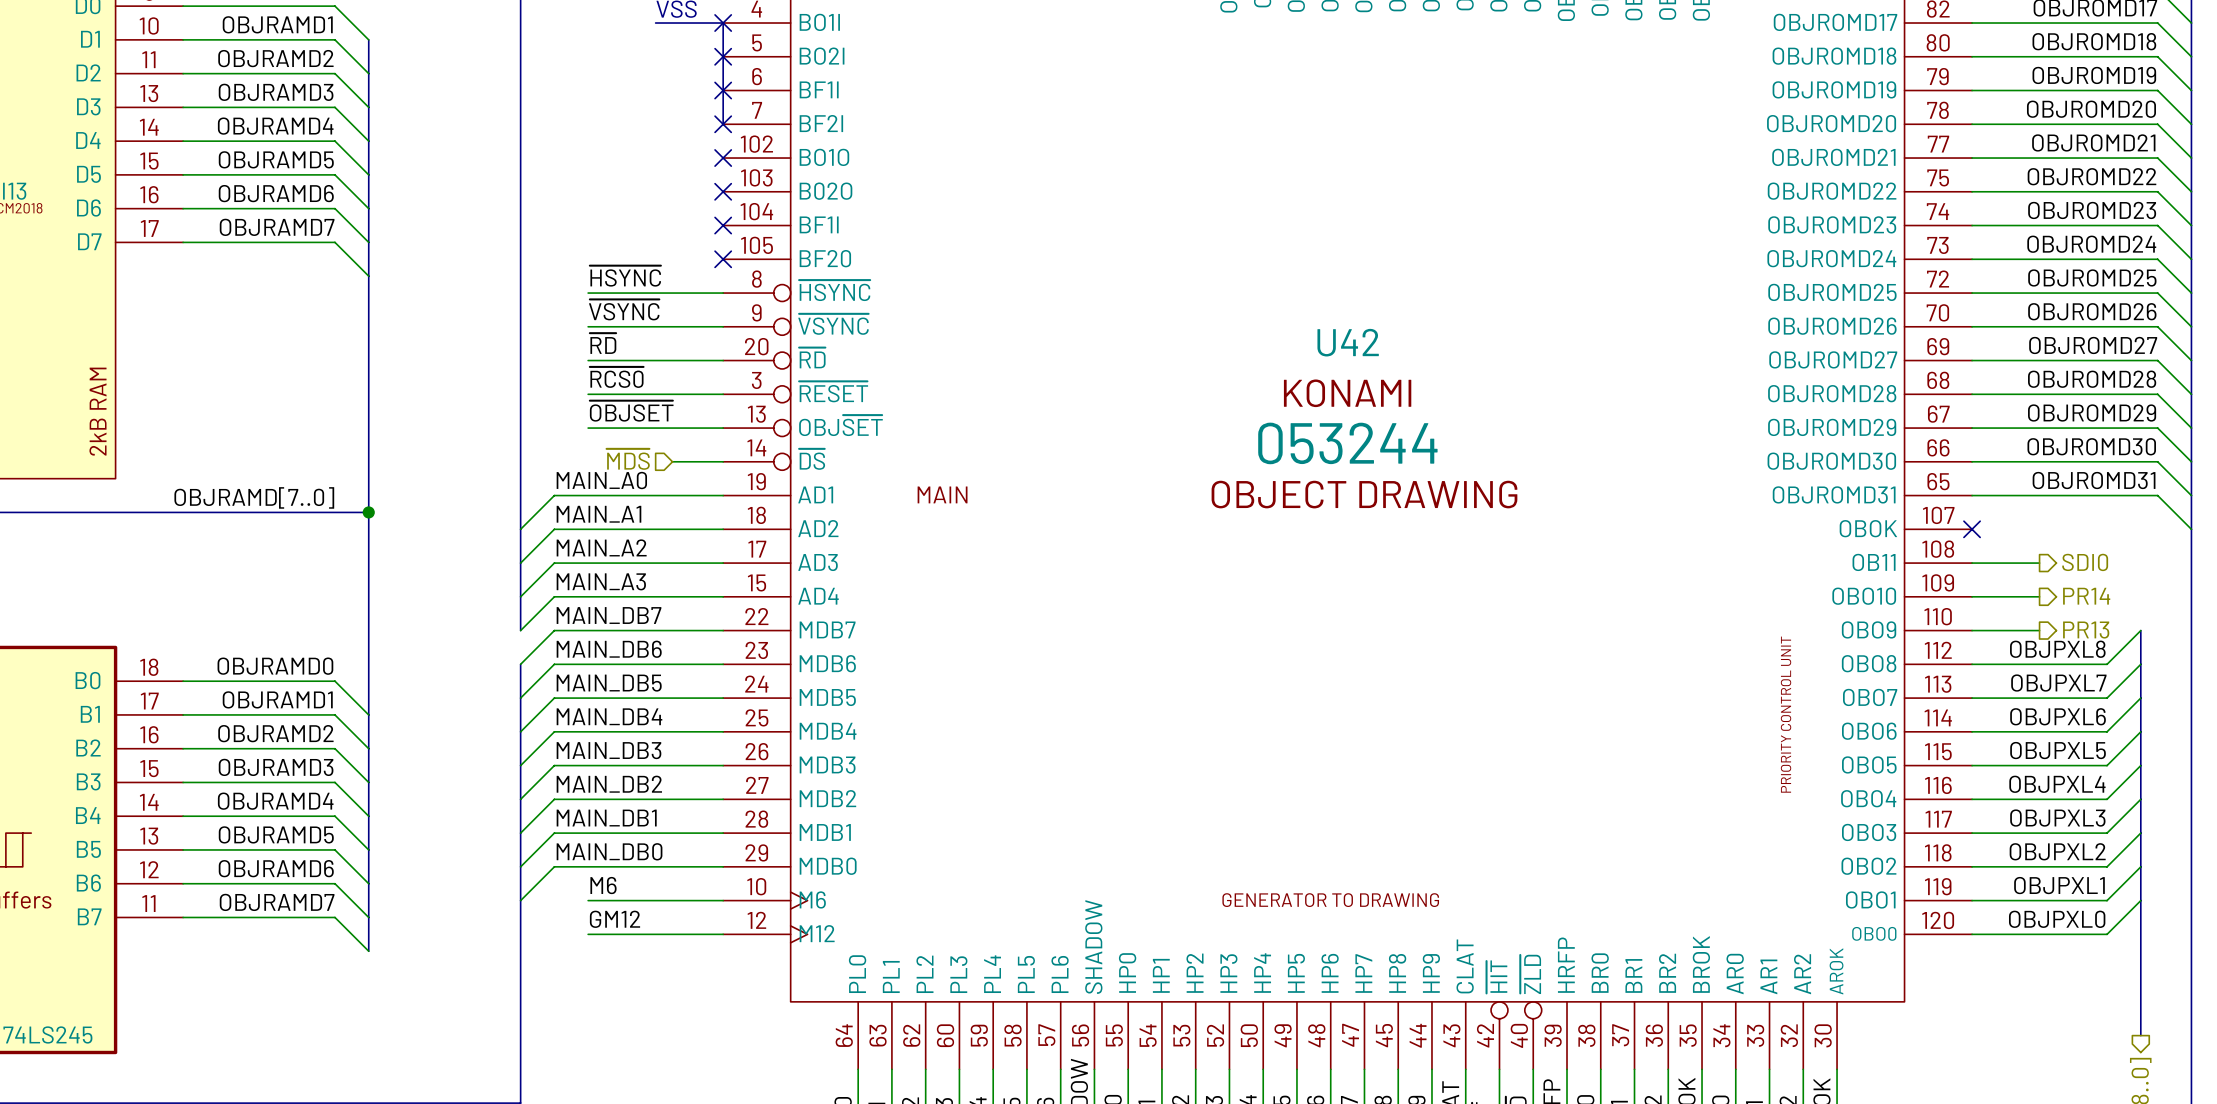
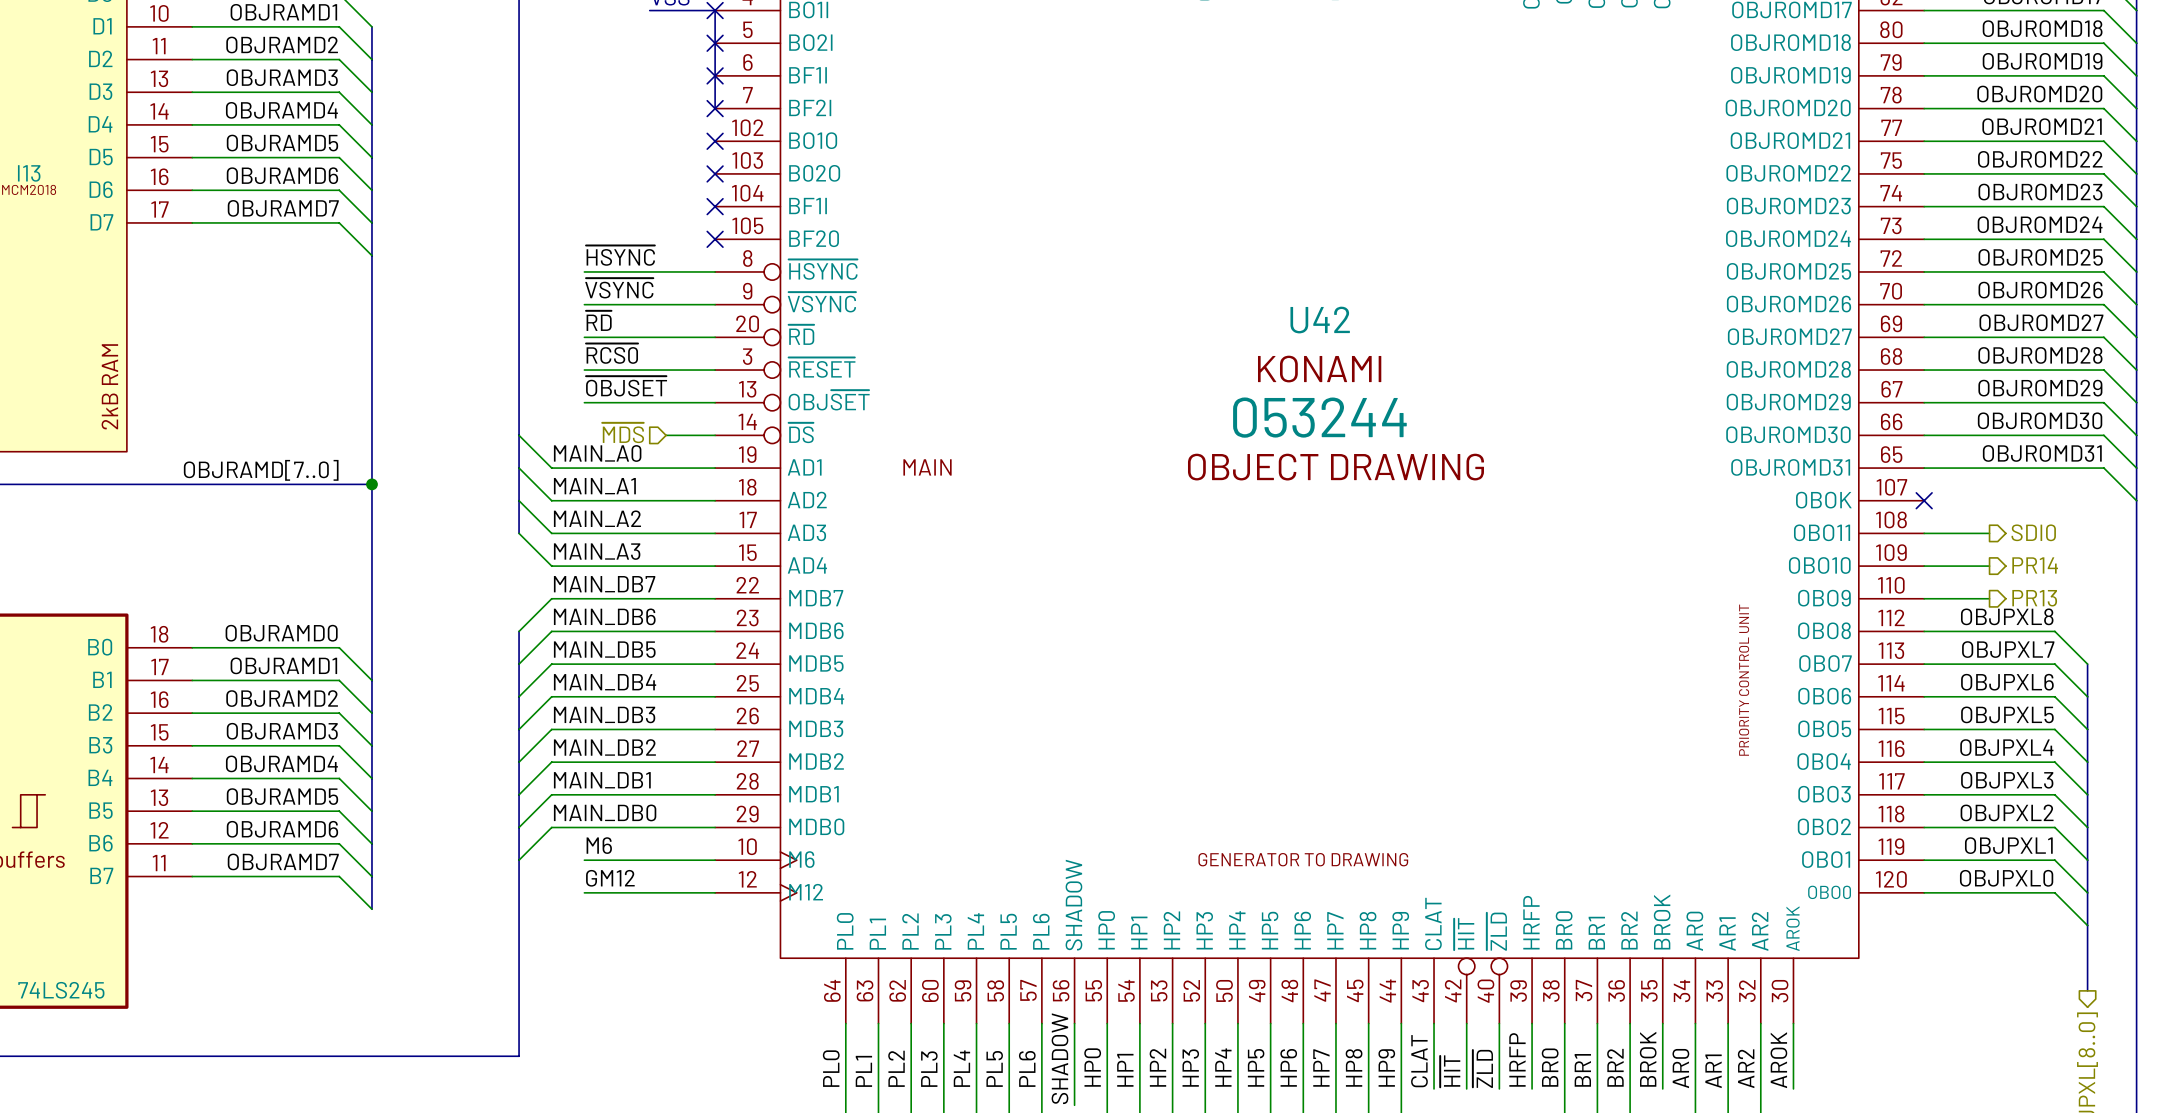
wire: none -> (519, 468) (551, 500)
wire: (554, 495) (520, 529) -> (551, 468) (519, 435)
wire: (554, 529) (520, 563) -> (551, 566) (519, 533)
U42 pin name: OB11 (1874, 562) -> OBO11 (1822, 532)
bus: (520, 563) (520, 630) -> none
wire: (554, 563) (520, 596) -> (551, 533) (519, 500)
wire: (554, 596) (520, 630) -> none
wire: (2140, 630) (2107, 664) -> (2087, 664) (2054, 631)
bus: (2140, 630) (2140, 698) -> none
wire: (2140, 664) (2107, 698) -> (2087, 696) (2054, 664)
wire: (2140, 698) (2107, 731) -> (2087, 729) (2054, 696)
wire: (2140, 731) (2107, 765) -> (2087, 762) (2054, 729)
wire: (2140, 765) (2107, 799) -> (2087, 794) (2054, 762)
wire: (2140, 799) (2107, 833) -> (2087, 827) (2054, 794)
wire: (2140, 833) (2107, 866) -> (2087, 860) (2054, 827)
wire: (2140, 866) (2107, 900) -> (2087, 892) (2054, 860)
wire: (2140, 900) (2107, 934) -> (2087, 925) (2054, 892)

